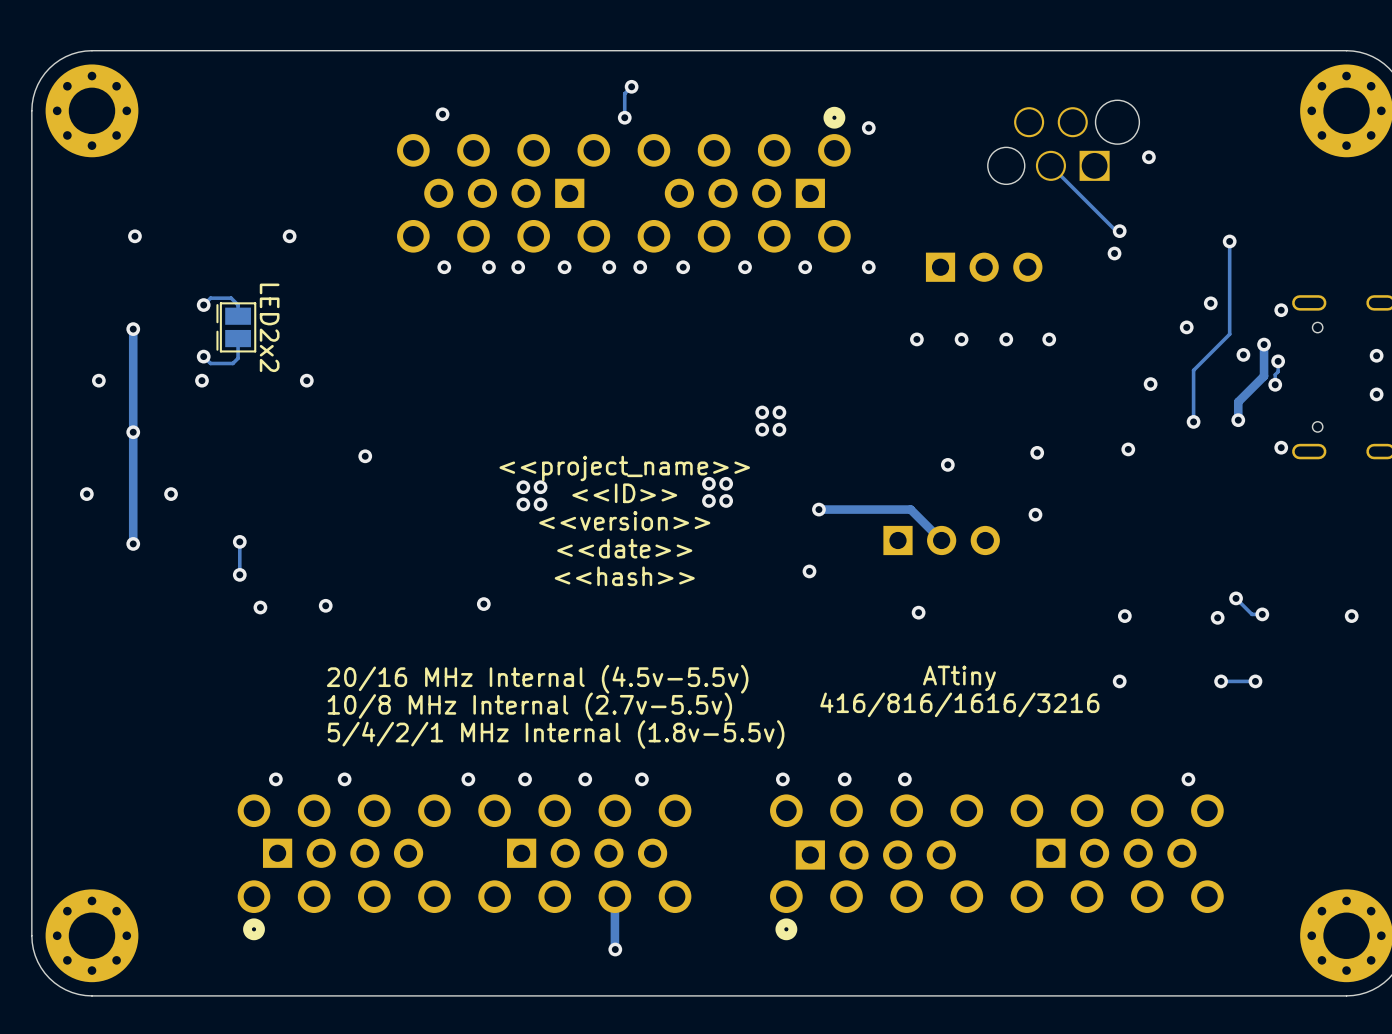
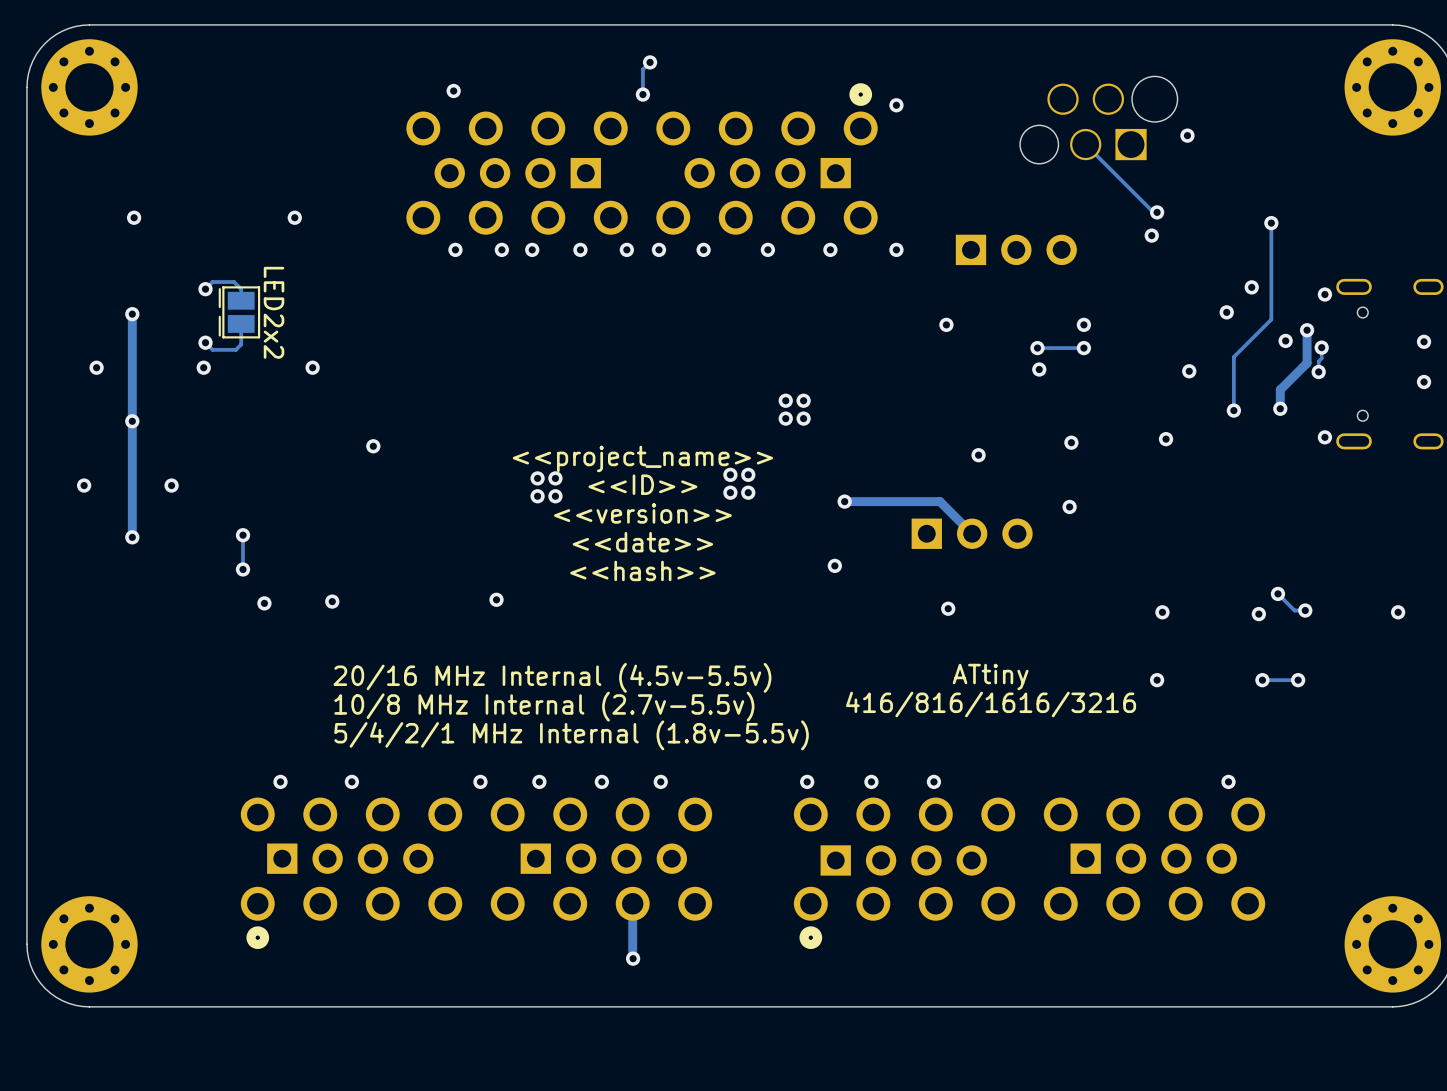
via: (961, 339) -> none
via: (1006, 339) -> none
via: none -> (1037, 348)
track: none -> (1083, 348) (1040, 348)
via: none -> (1083, 348)
via: none -> (1039, 369)

